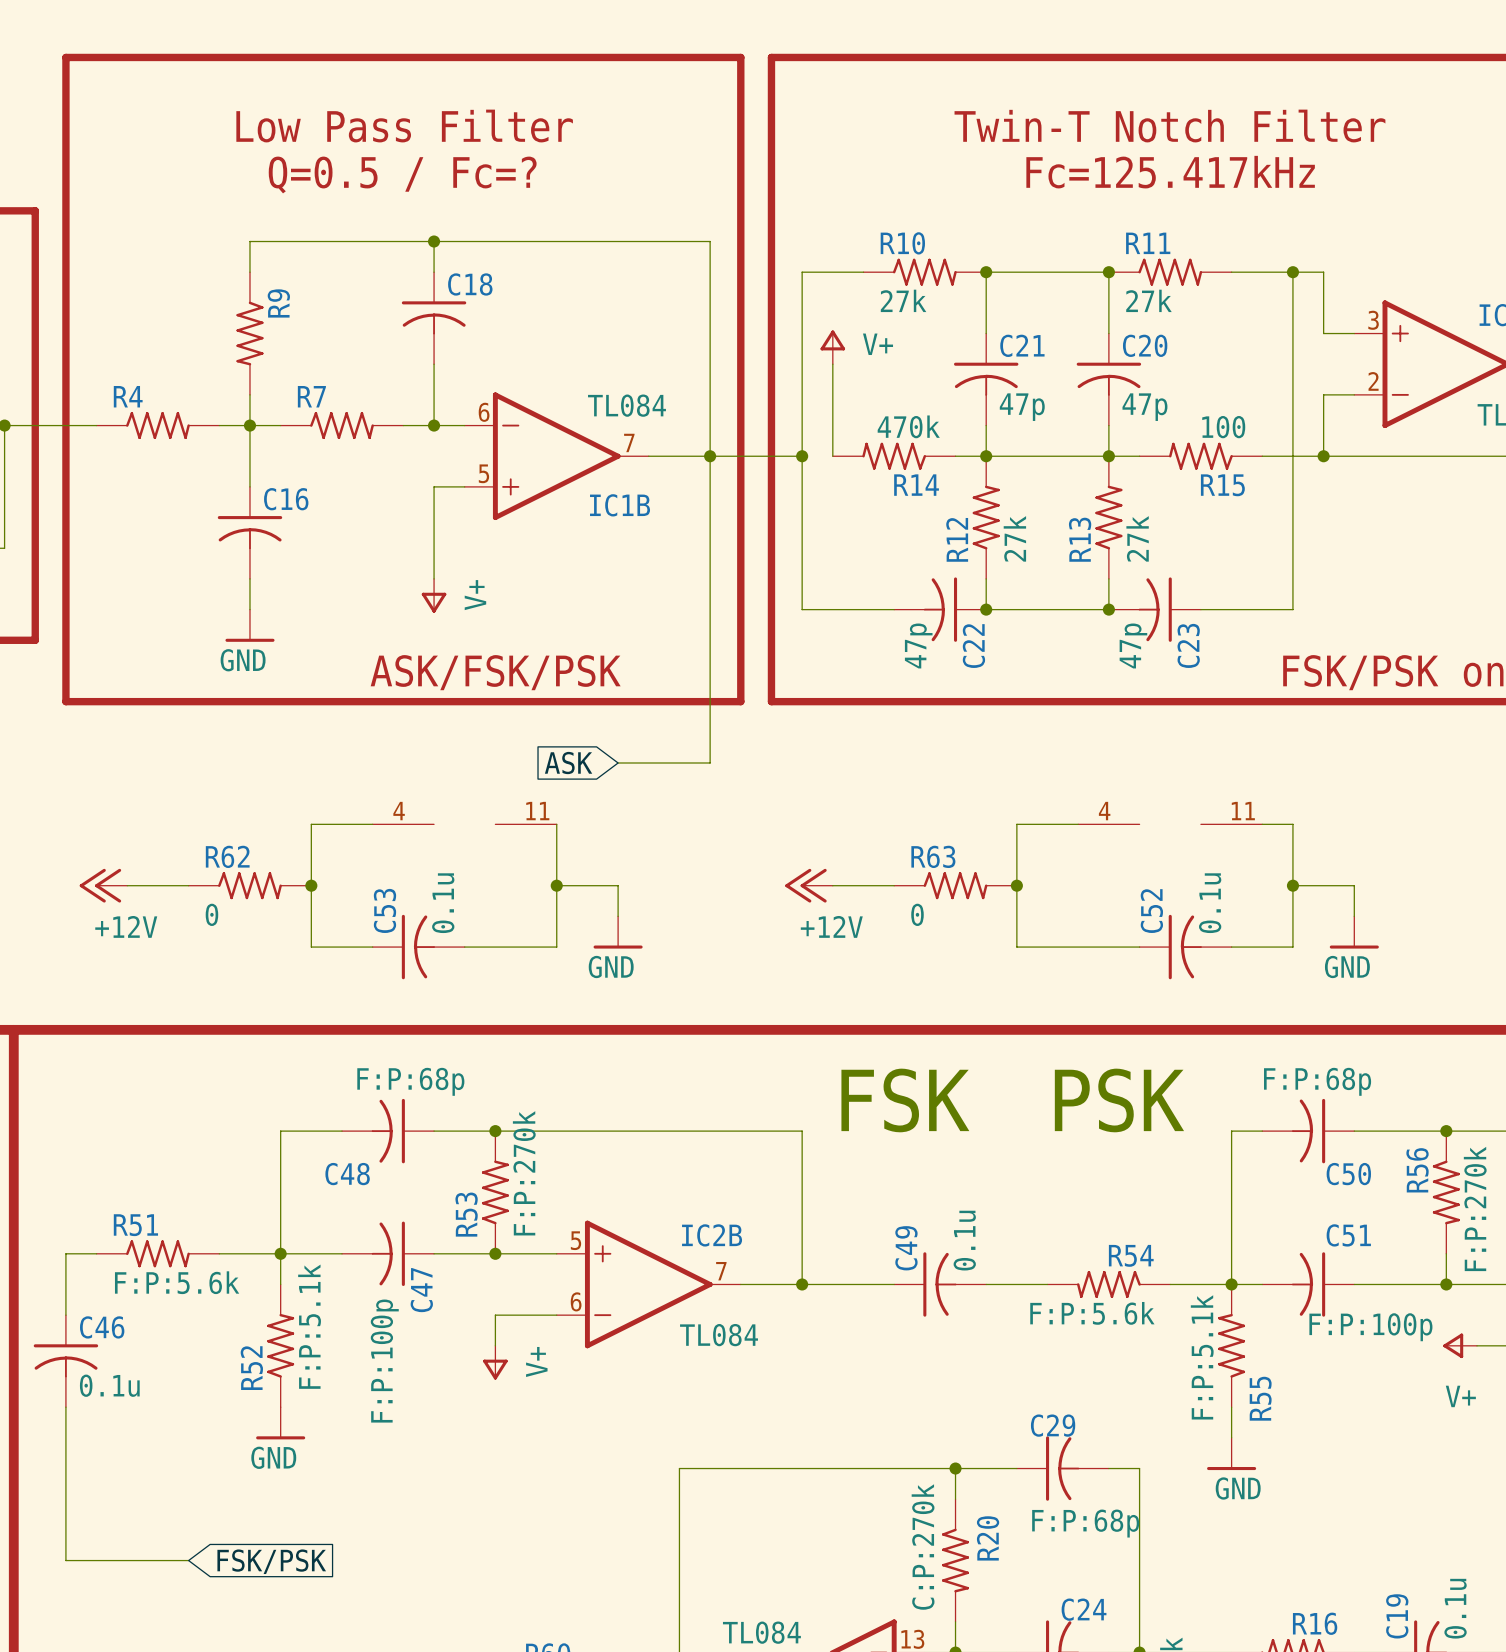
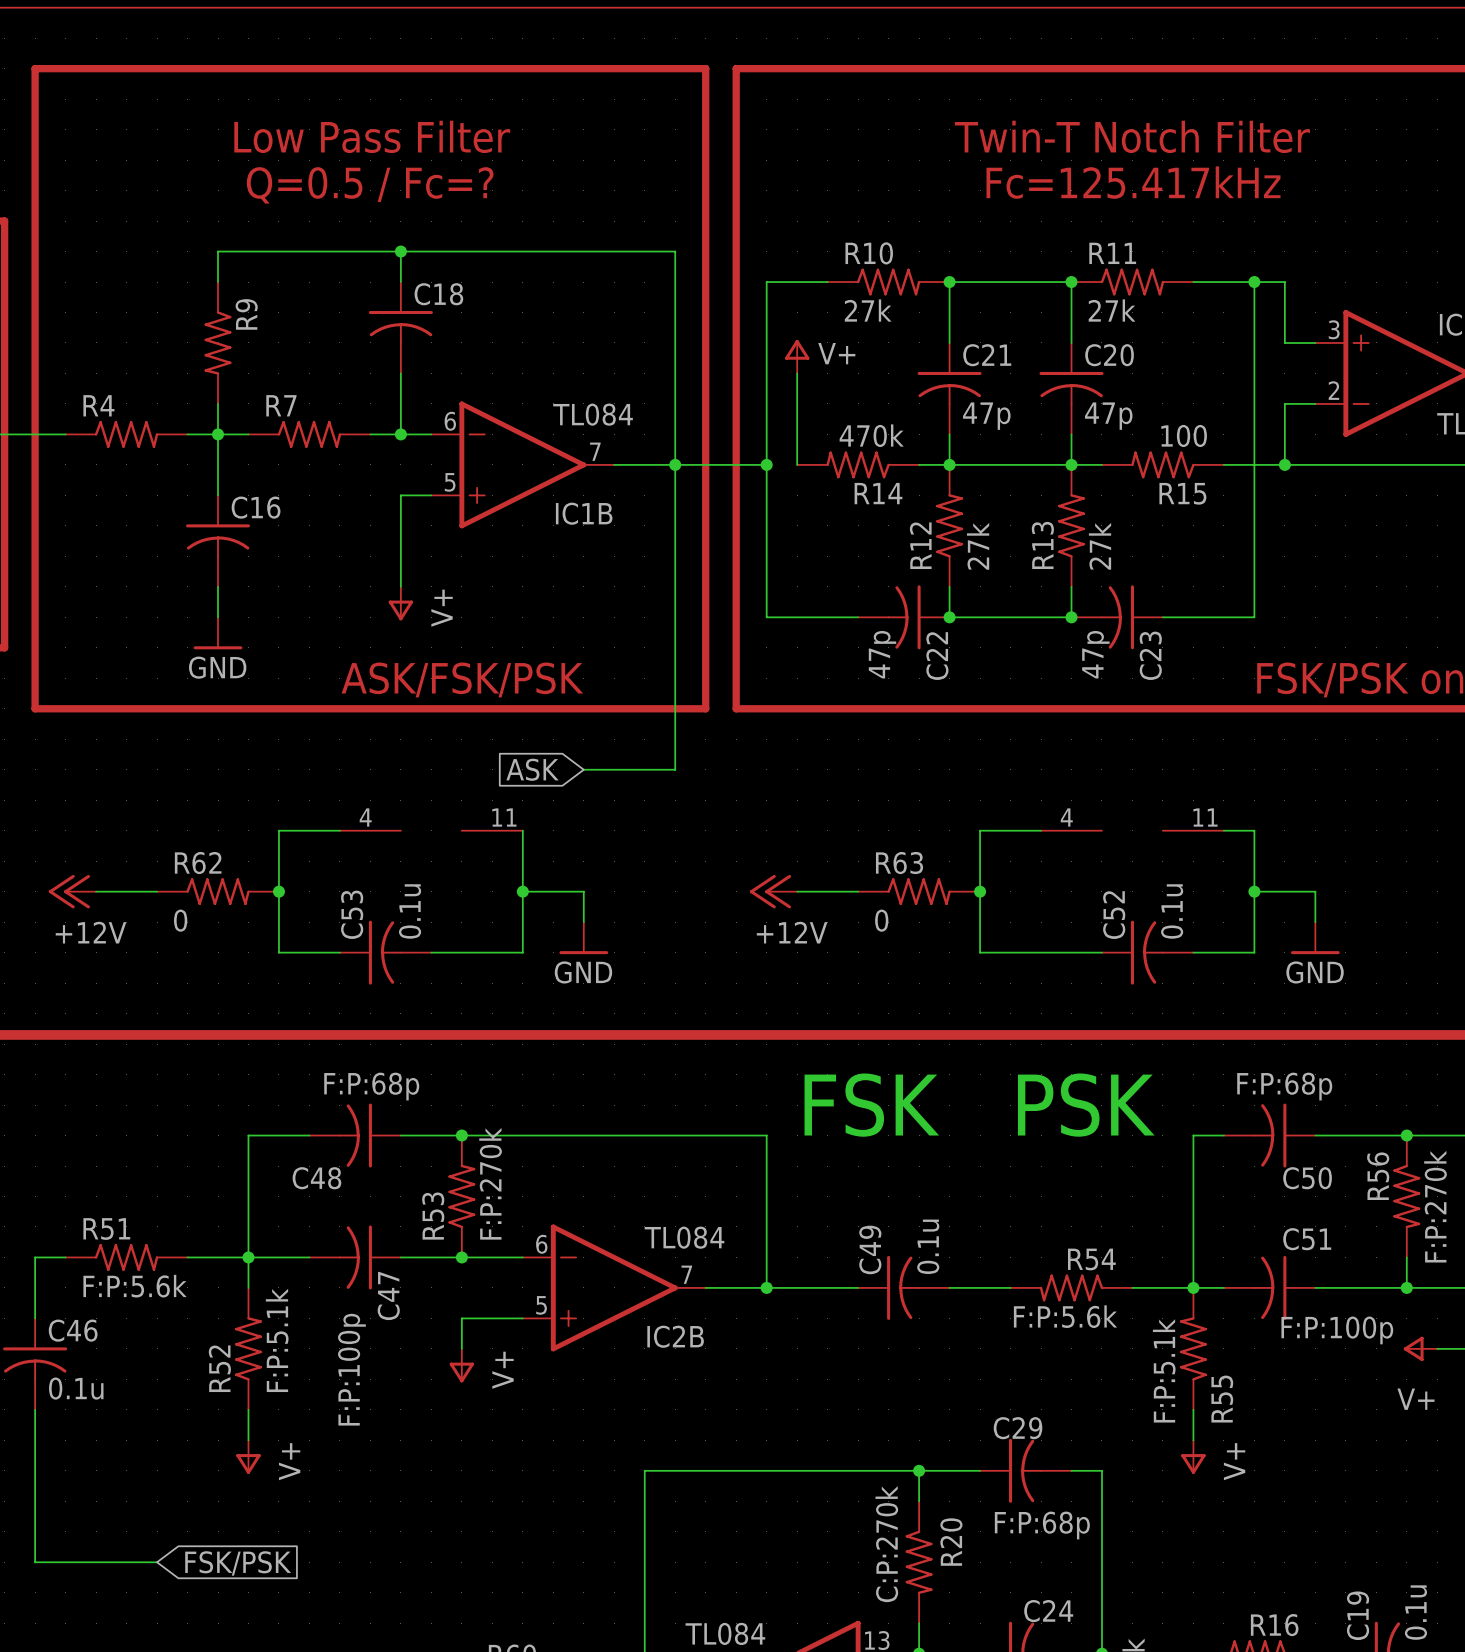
IC2B flip: as is (648, 1284) -> up-down (614, 1287)
power symbol: GND (280, 1423) -> none
power symbol: GND (1231, 1453) -> V+ (1193, 1457)
power symbol: none -> V+ (248, 1457)

